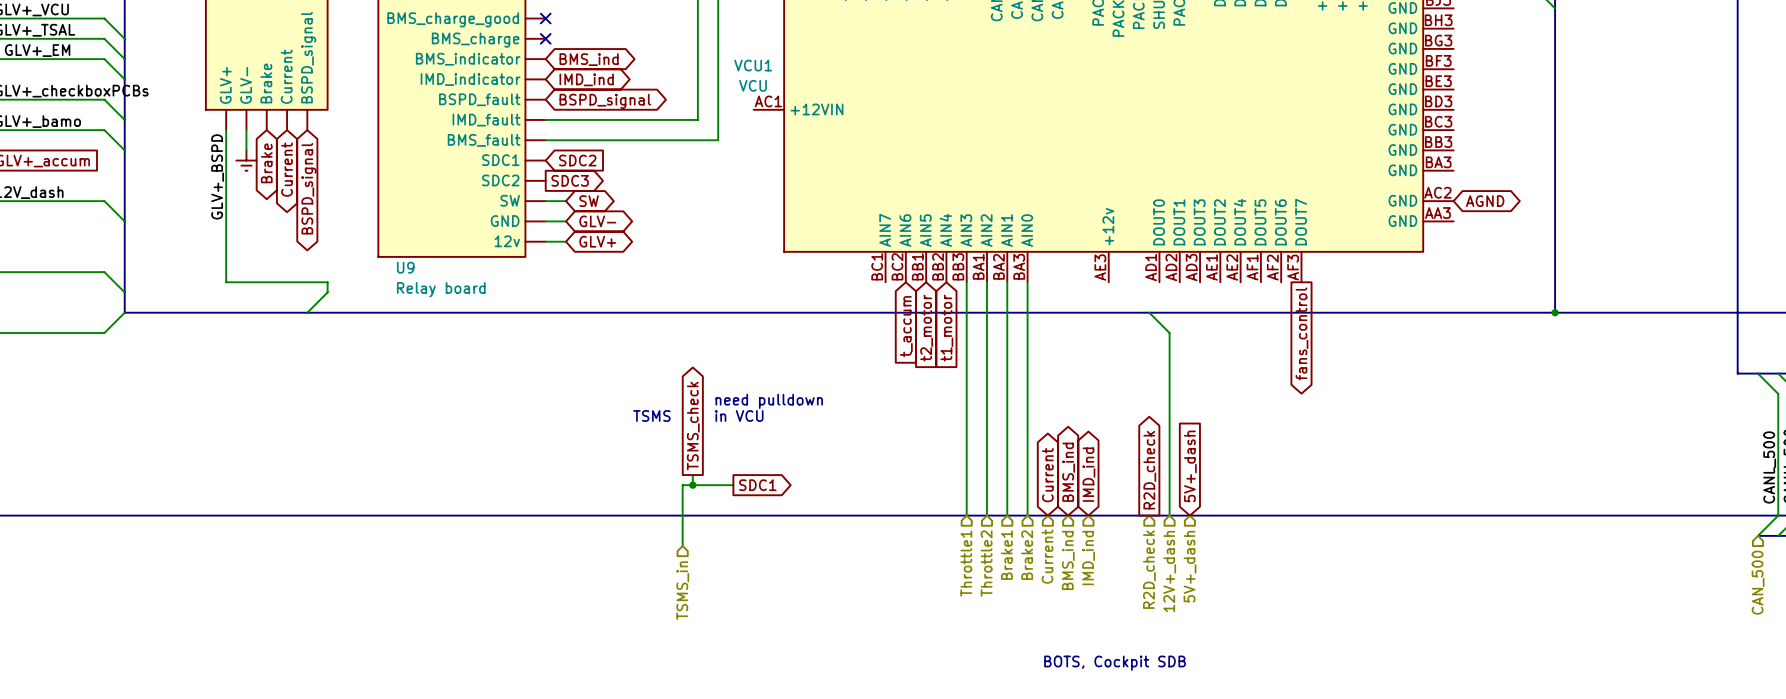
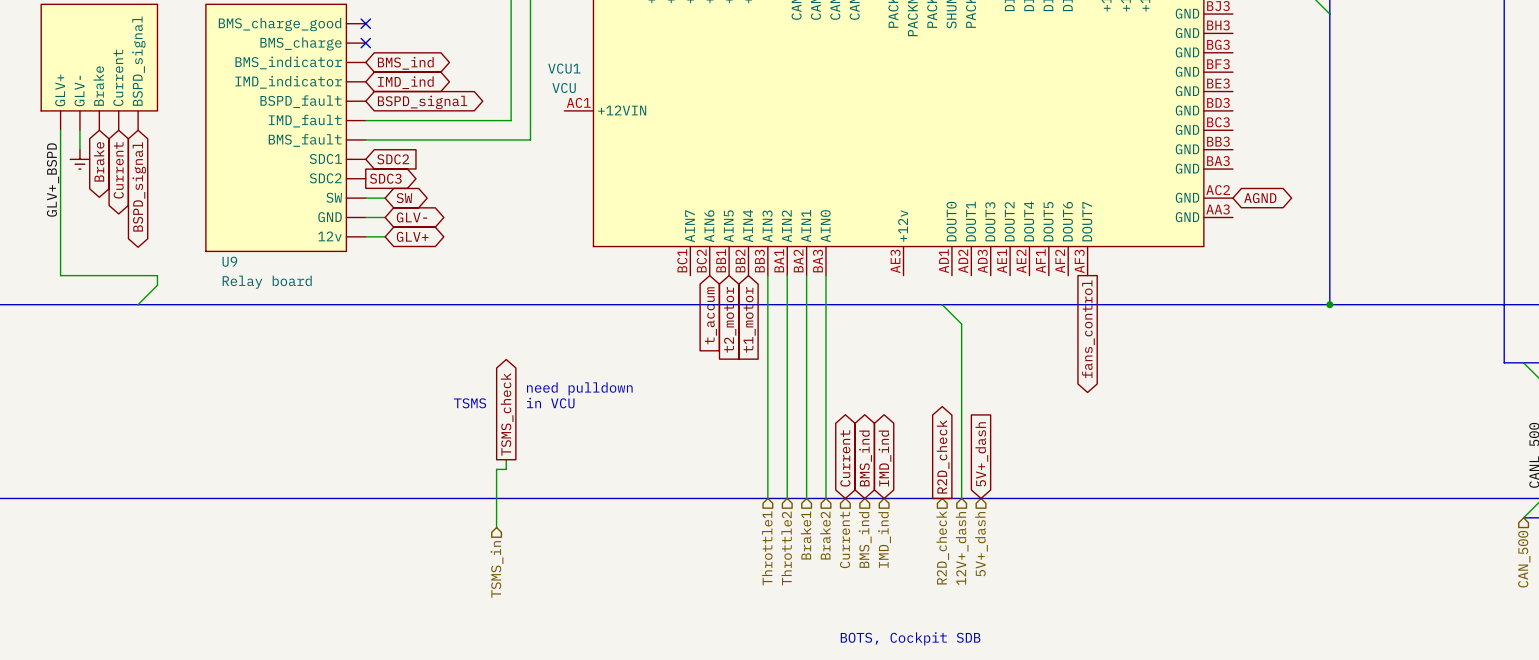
wire: (692, 485) (733, 485) -> none
junction: (692, 485) -> none
global label: SDC1 (757, 485) -> none

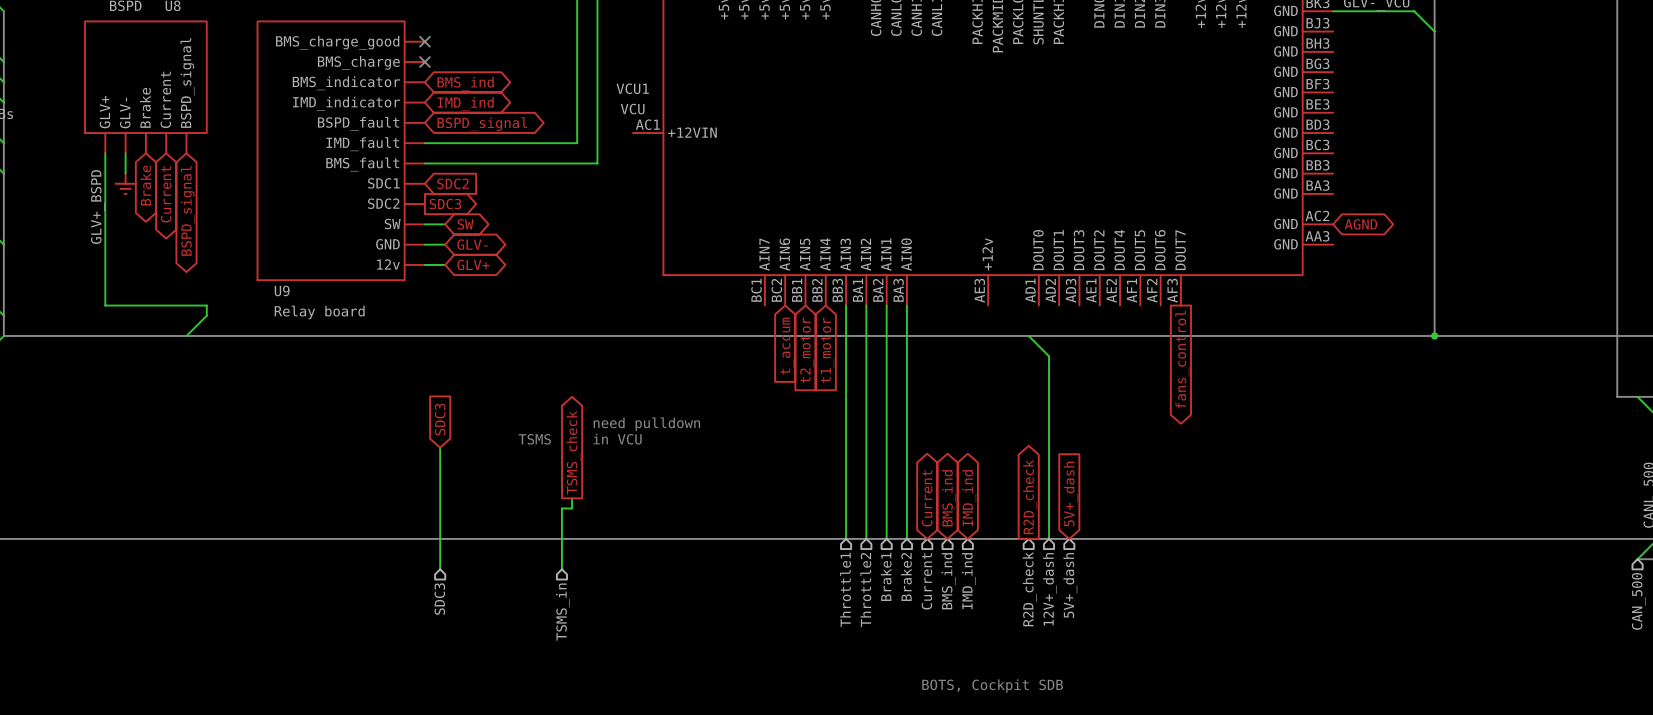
global label: none -> SDC3 (440, 419)
wire: none -> (440, 447) (440, 569)
hierarchical label: none -> SDC3 (439, 599)

